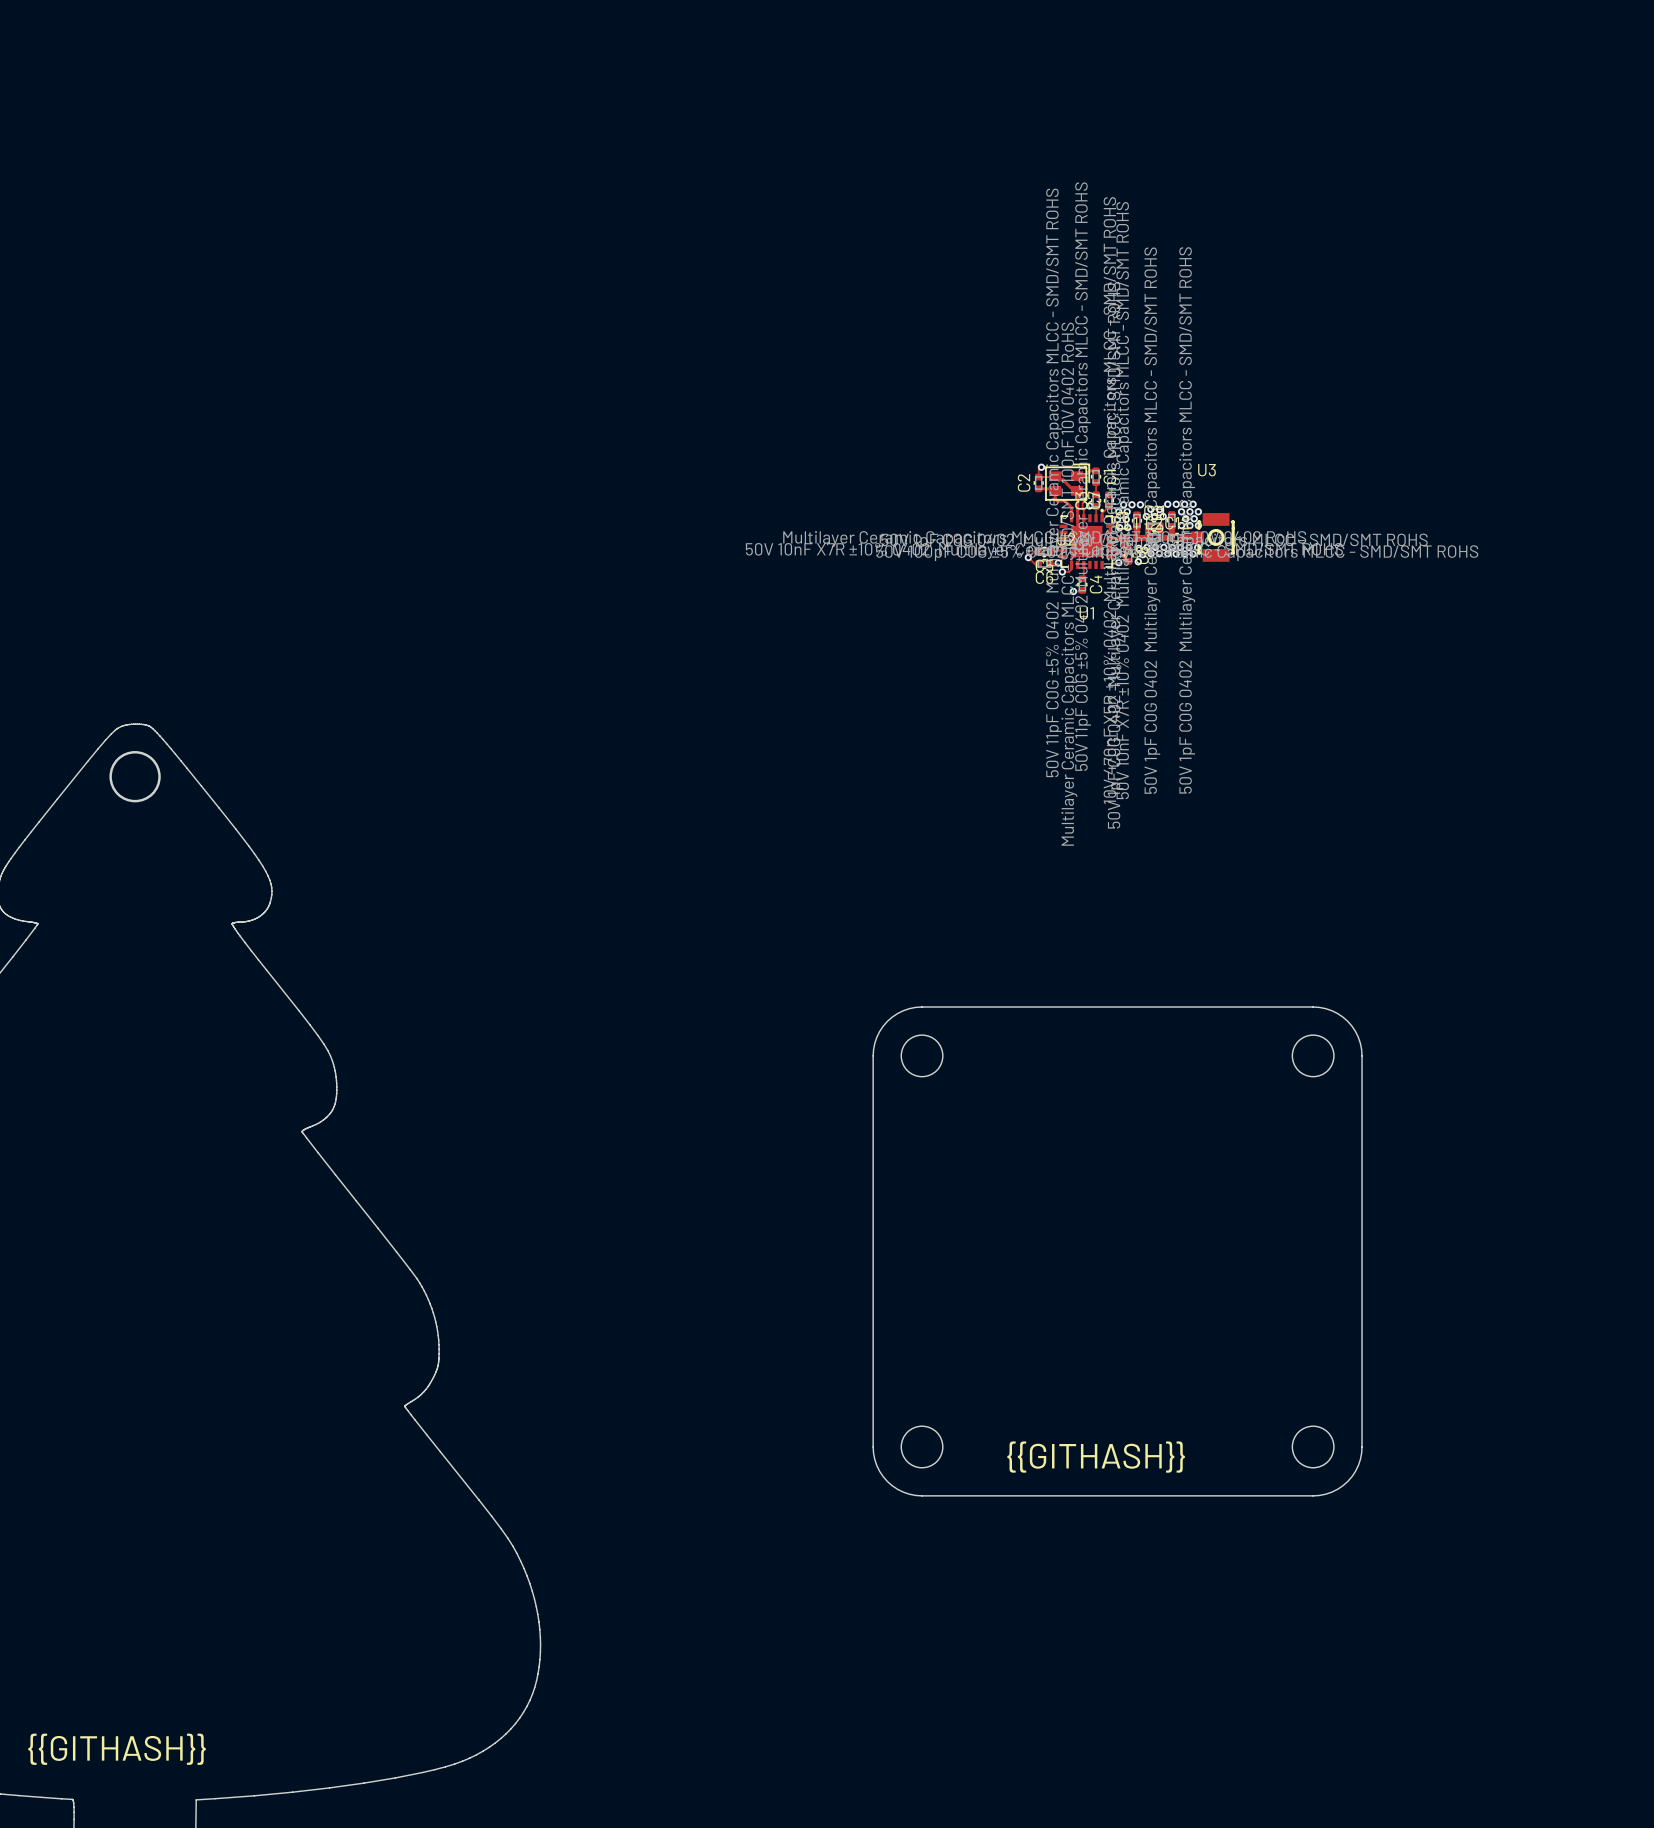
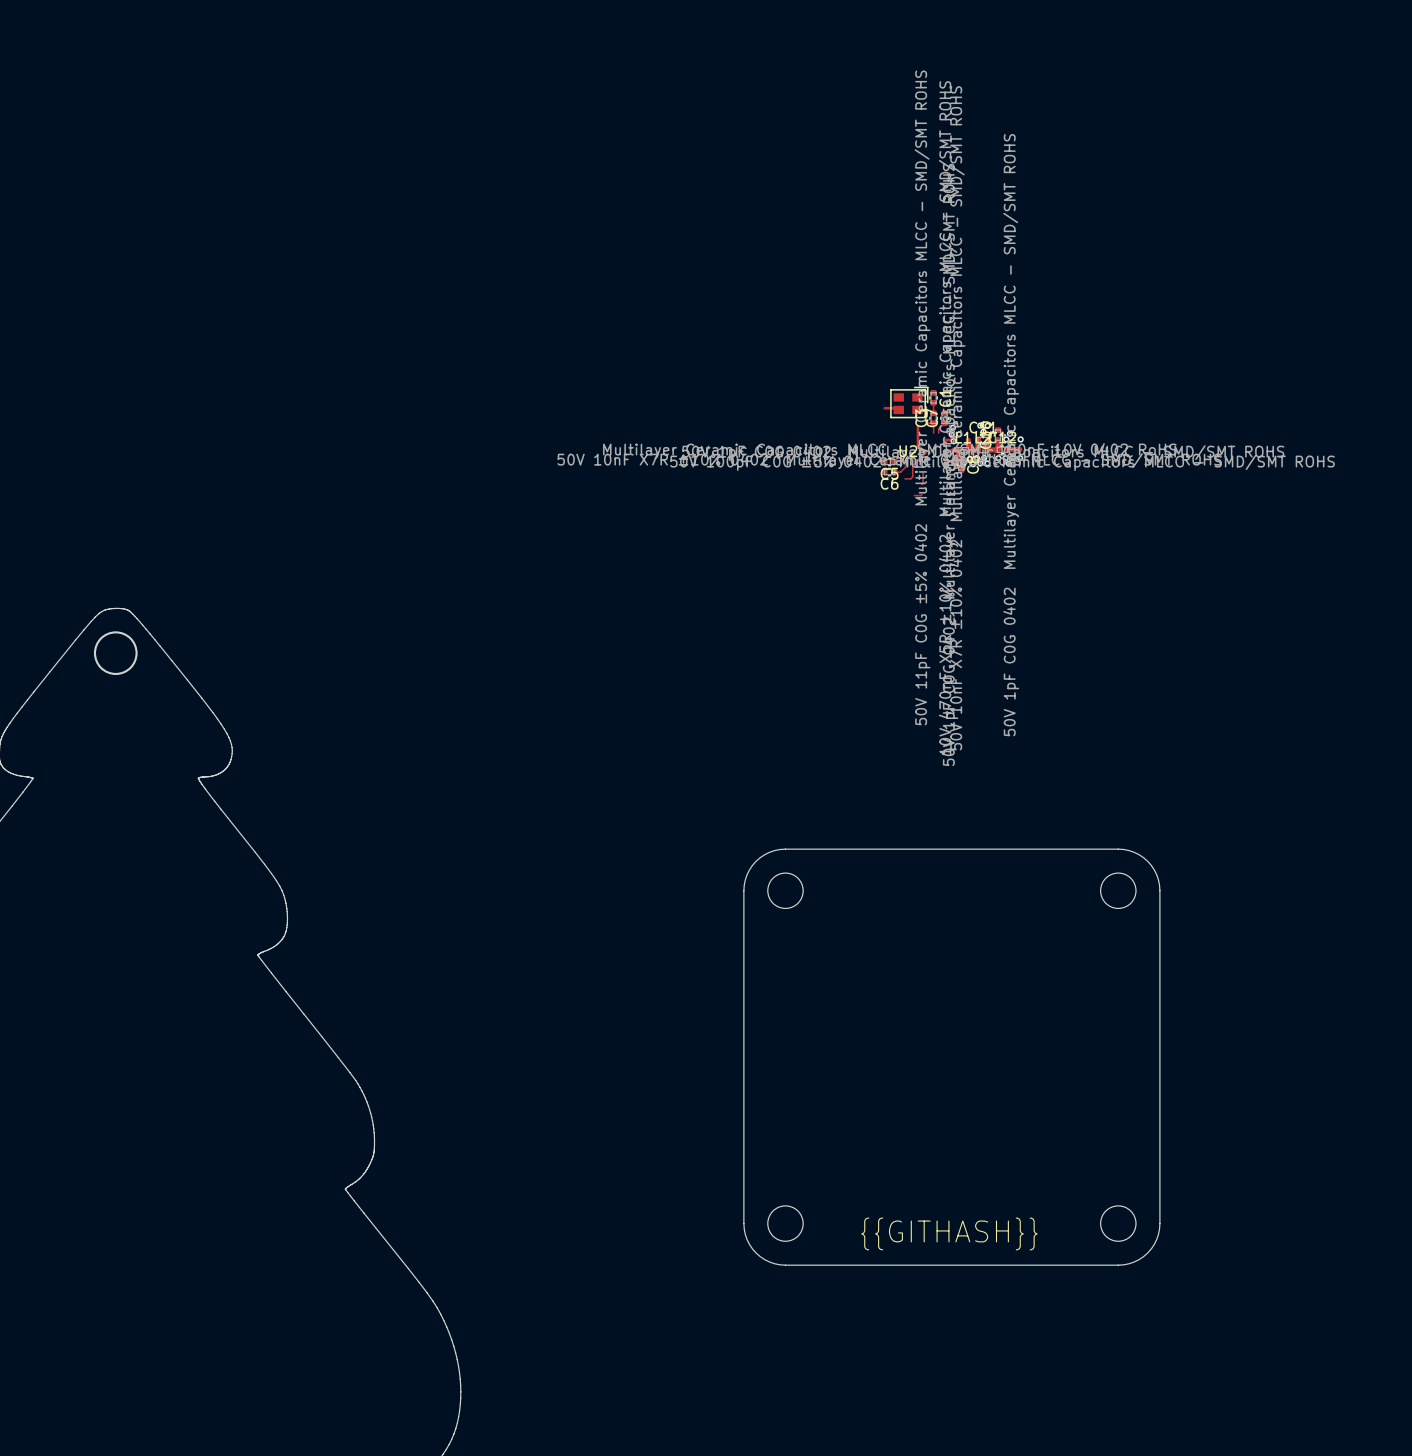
track: (1041, 467) (1038, 470) (1038, 477) (1055, 476) (1058, 479) (1063, 479) (1074, 490) (1077, 491) (1077, 510) -> none
via: (1041, 467) -> none
track: (1096, 470) (1089, 470) (1084, 476) (1077, 476) (1086, 476) (1086, 499) (1082, 503) (1083, 518) -> none
C2: 50V 11pF C0G ±5% 0402 Multilayer Ceramic Capacitors MLCC - SMD/SMT ROHS (1038, 483) -> none
track: (1053, 492) (1055, 490) (1055, 498) (1057, 500) (1065, 500) (1071, 507) (1071, 518) -> none
via: (1123, 504) -> none
via: (1131, 504) -> none
via: (1140, 504) -> none
via: (1167, 504) -> none
via: (1176, 504) -> none
via: (1184, 504) -> none
via: (1193, 504) -> none
via: (1089, 505) -> none
via: (1127, 511) -> none
via: (1181, 511) -> none
via: (1189, 511) -> none
via: (1198, 511) -> none
via: (1146, 516) -> none
via: (1163, 516) -> none
via: (1194, 518) -> none
part: 50V 1pF C0G 0402 Multilayer Ceramic Capacitors MLCC - SMD/SMT ROHS (1136, 520) -> none
via: (1189, 525) -> none
via: (1127, 527) -> none
U3: (1212, 537) -> none
U1: (1086, 538) -> none
via: (1163, 547) -> none
track: (1038, 552) (1033, 552) (1028, 557) (1034, 563) (1038, 563) -> none
via: (1167, 553) -> none
via: (1176, 554) -> none
via: (1192, 554) -> none
via: (1028, 557) -> none
via: (1138, 561) -> none
via: (1118, 562) -> none
via: (1058, 563) -> none
via: (1062, 571) -> none
C4: Multilayer Ceramic Capacitors MLCC - SMD/SMT 100nF 10V 0402 RoHS (1082, 584) -> none
via: (1073, 591) -> none

